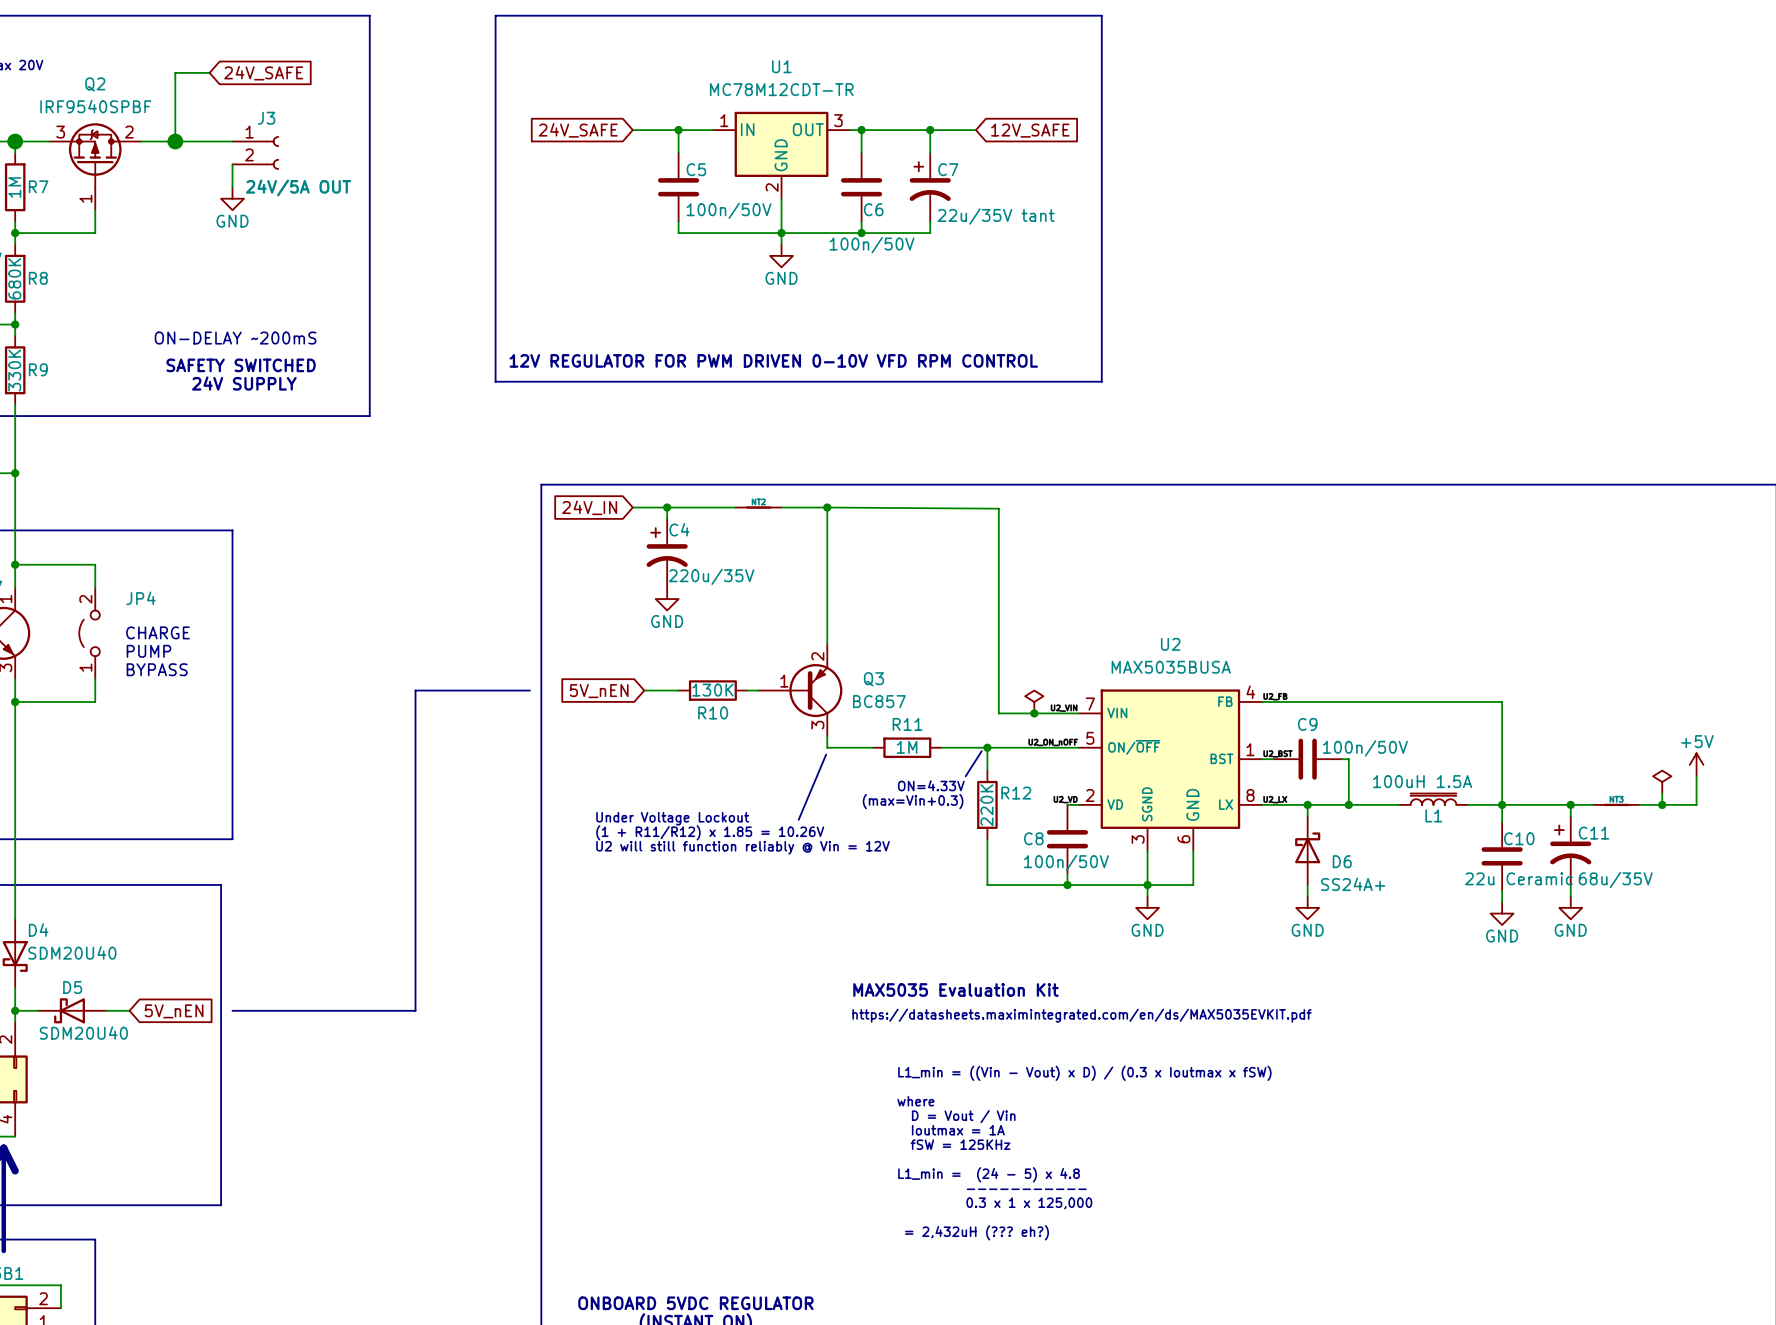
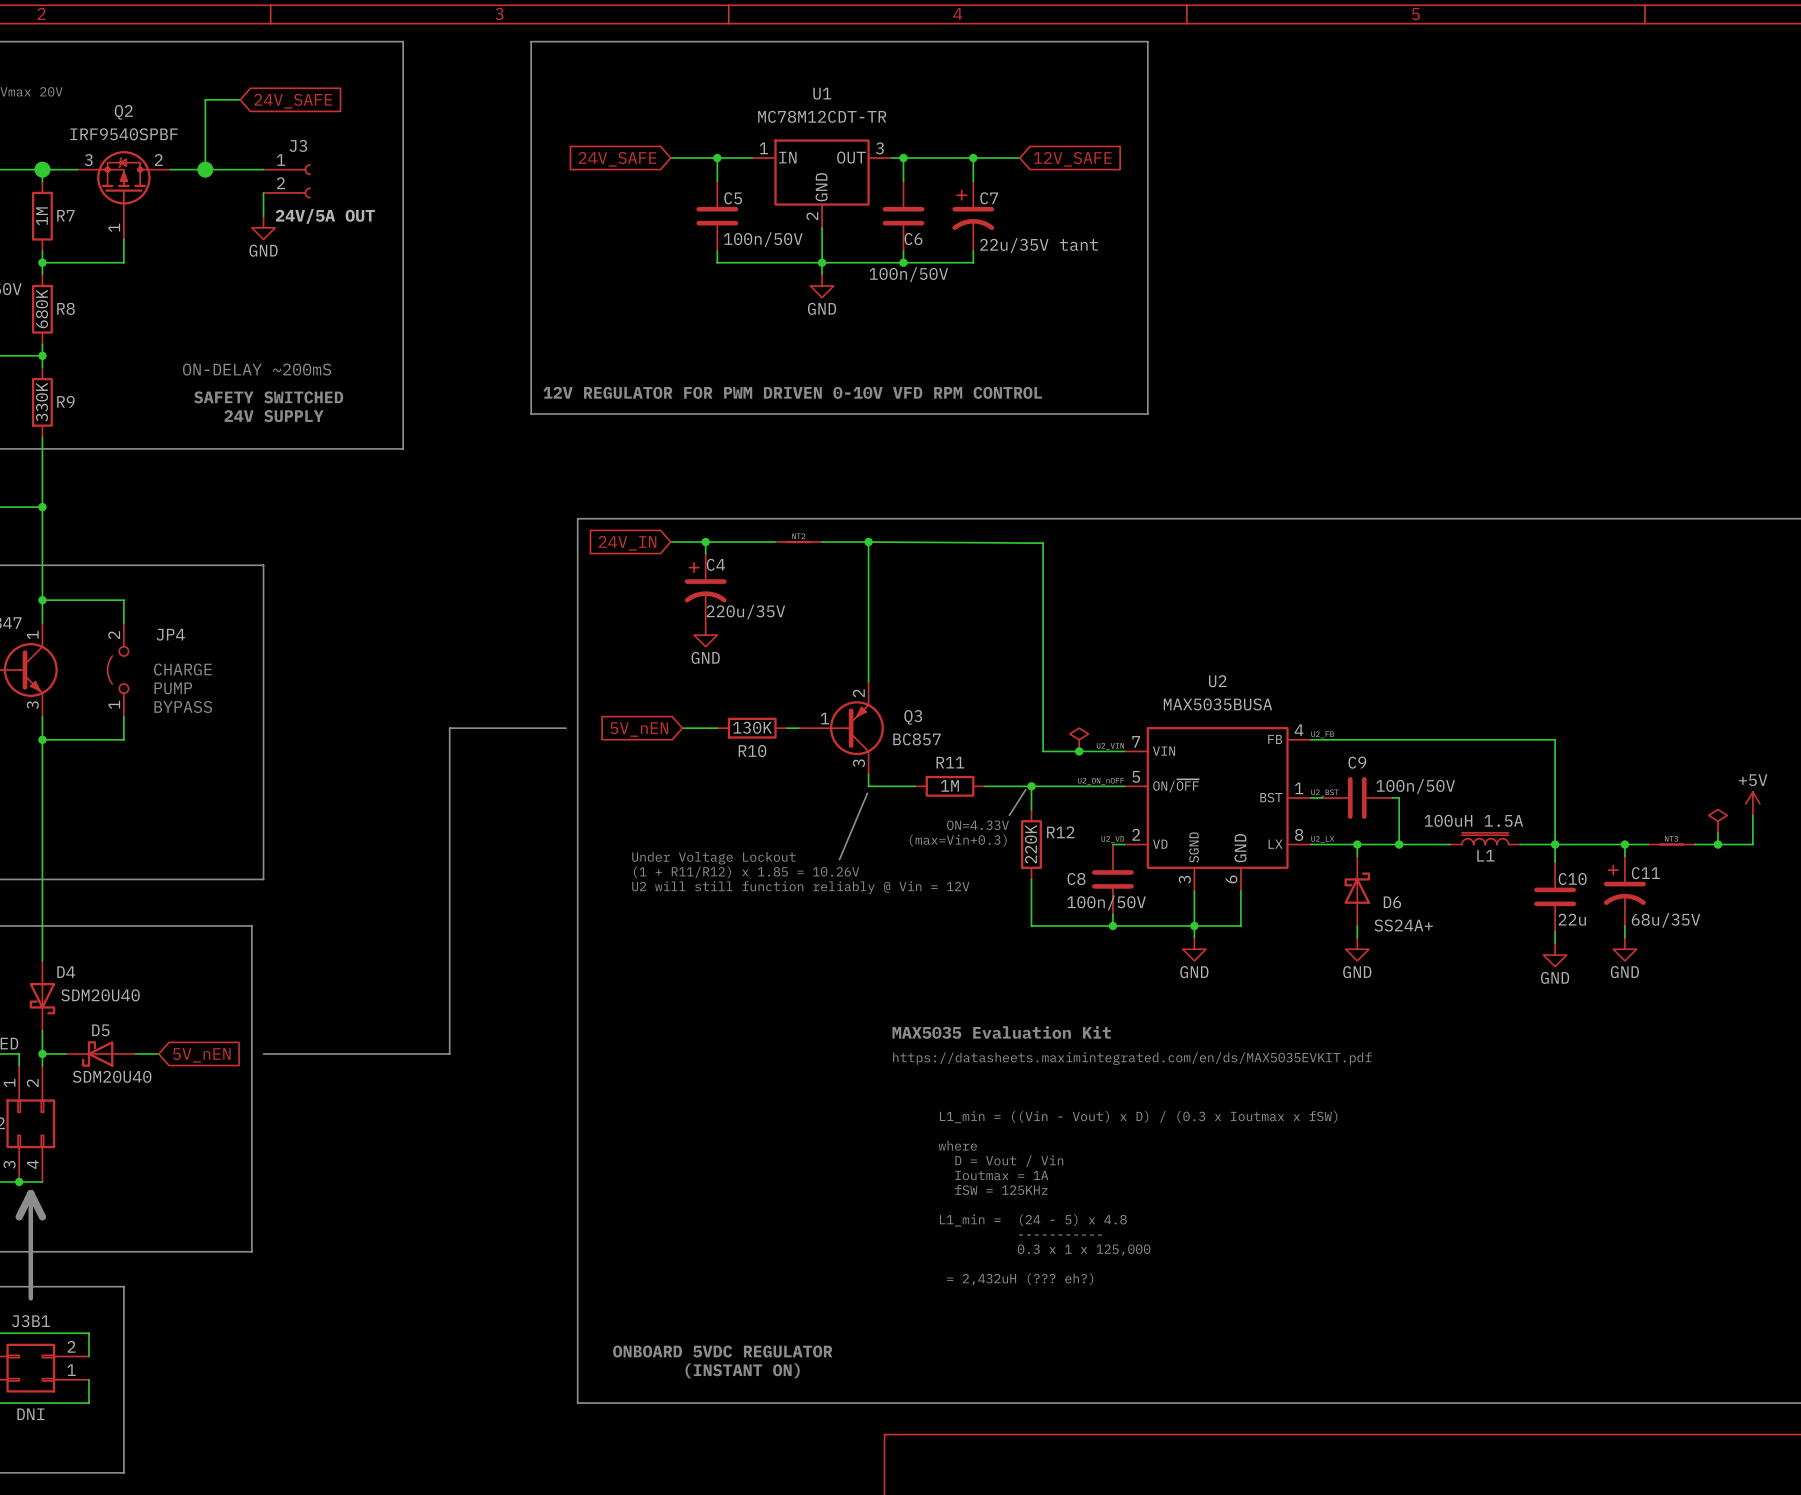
C10 value: 22u Ceramic (1519, 878) -> 22u (1572, 919)

